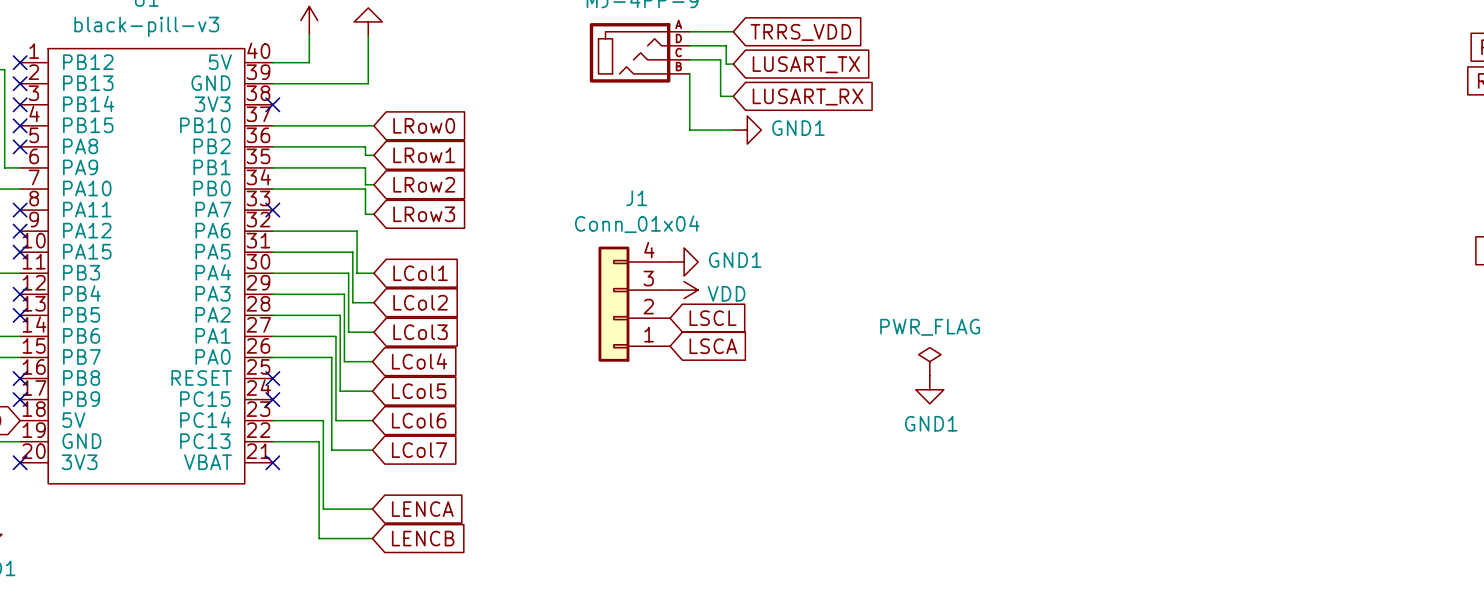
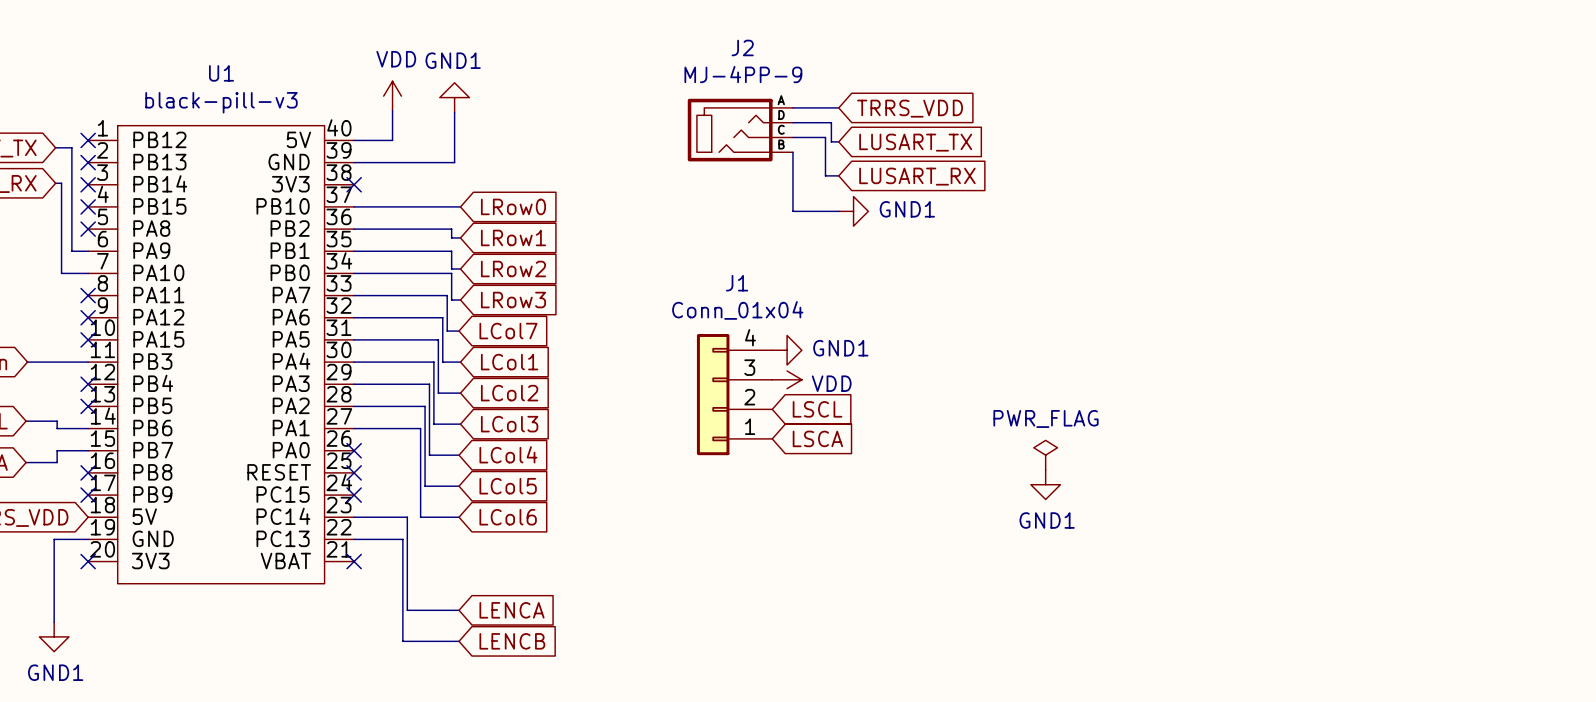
wire: none -> (354, 295) (447, 295) (447, 331) (459, 331)
no-connect mark: (272, 210) -> none
wire: (272, 357) (331, 357) (331, 450) (372, 450) -> none
no-connect mark: none -> (354, 450)
global label position: LCol7 (419, 450) -> LCol7 (508, 331)

